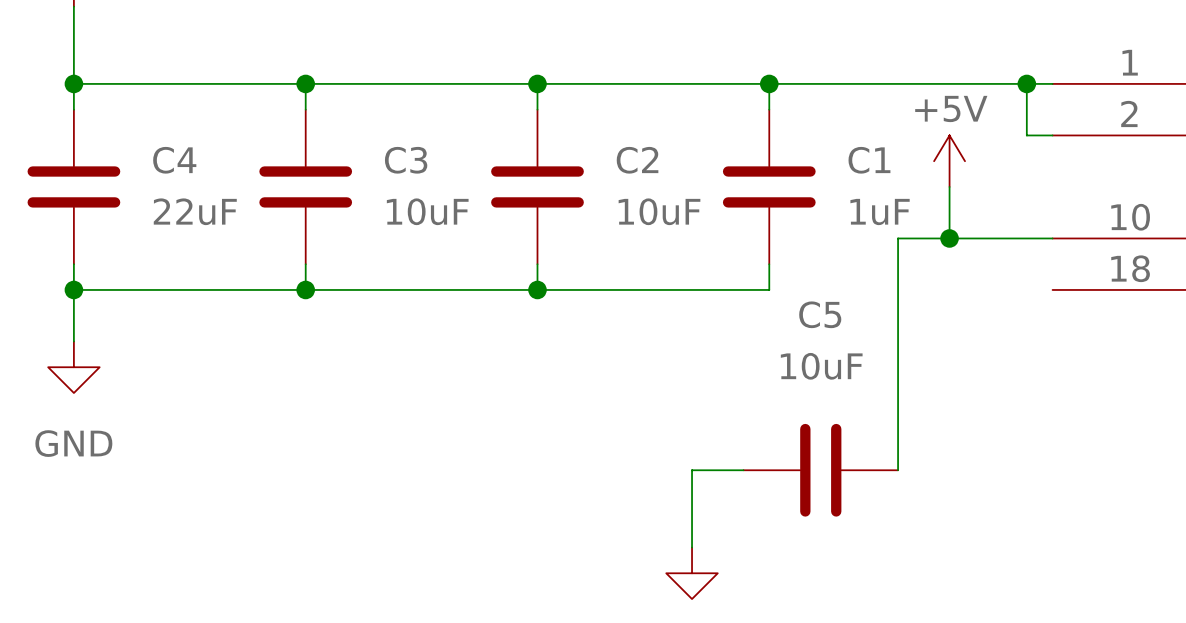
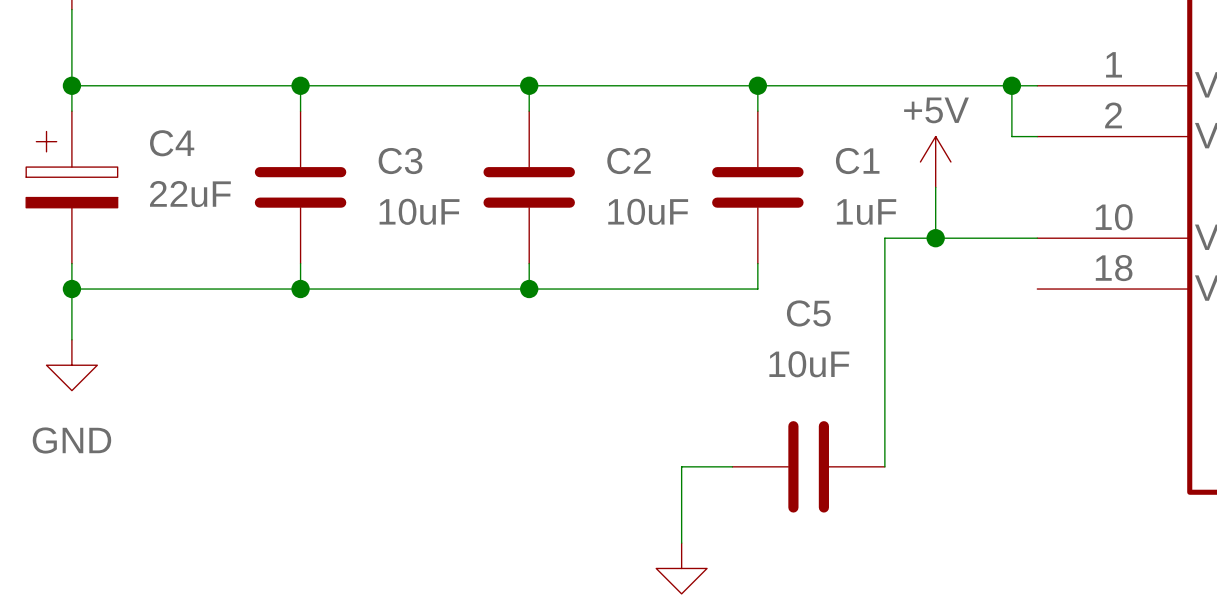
C4 symbol: [27, 109, 121, 265] -> [26, 111, 118, 264]

